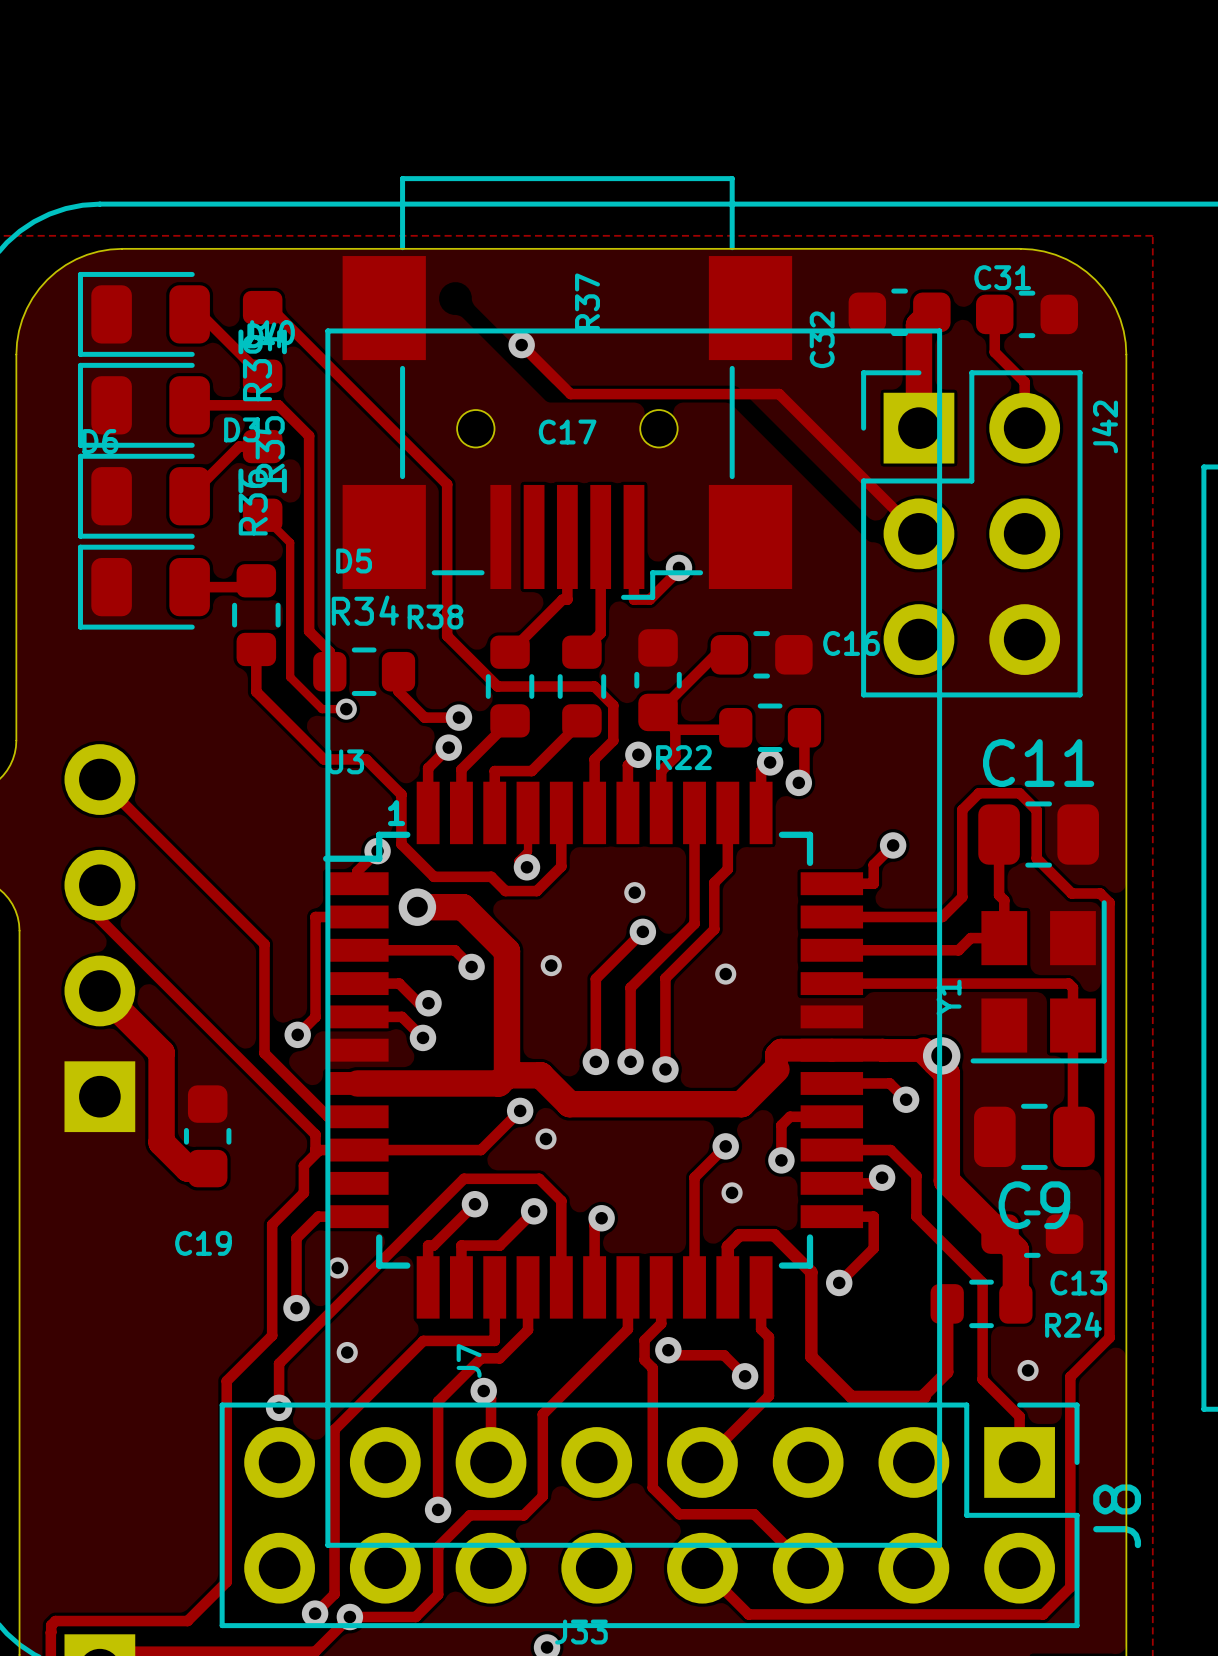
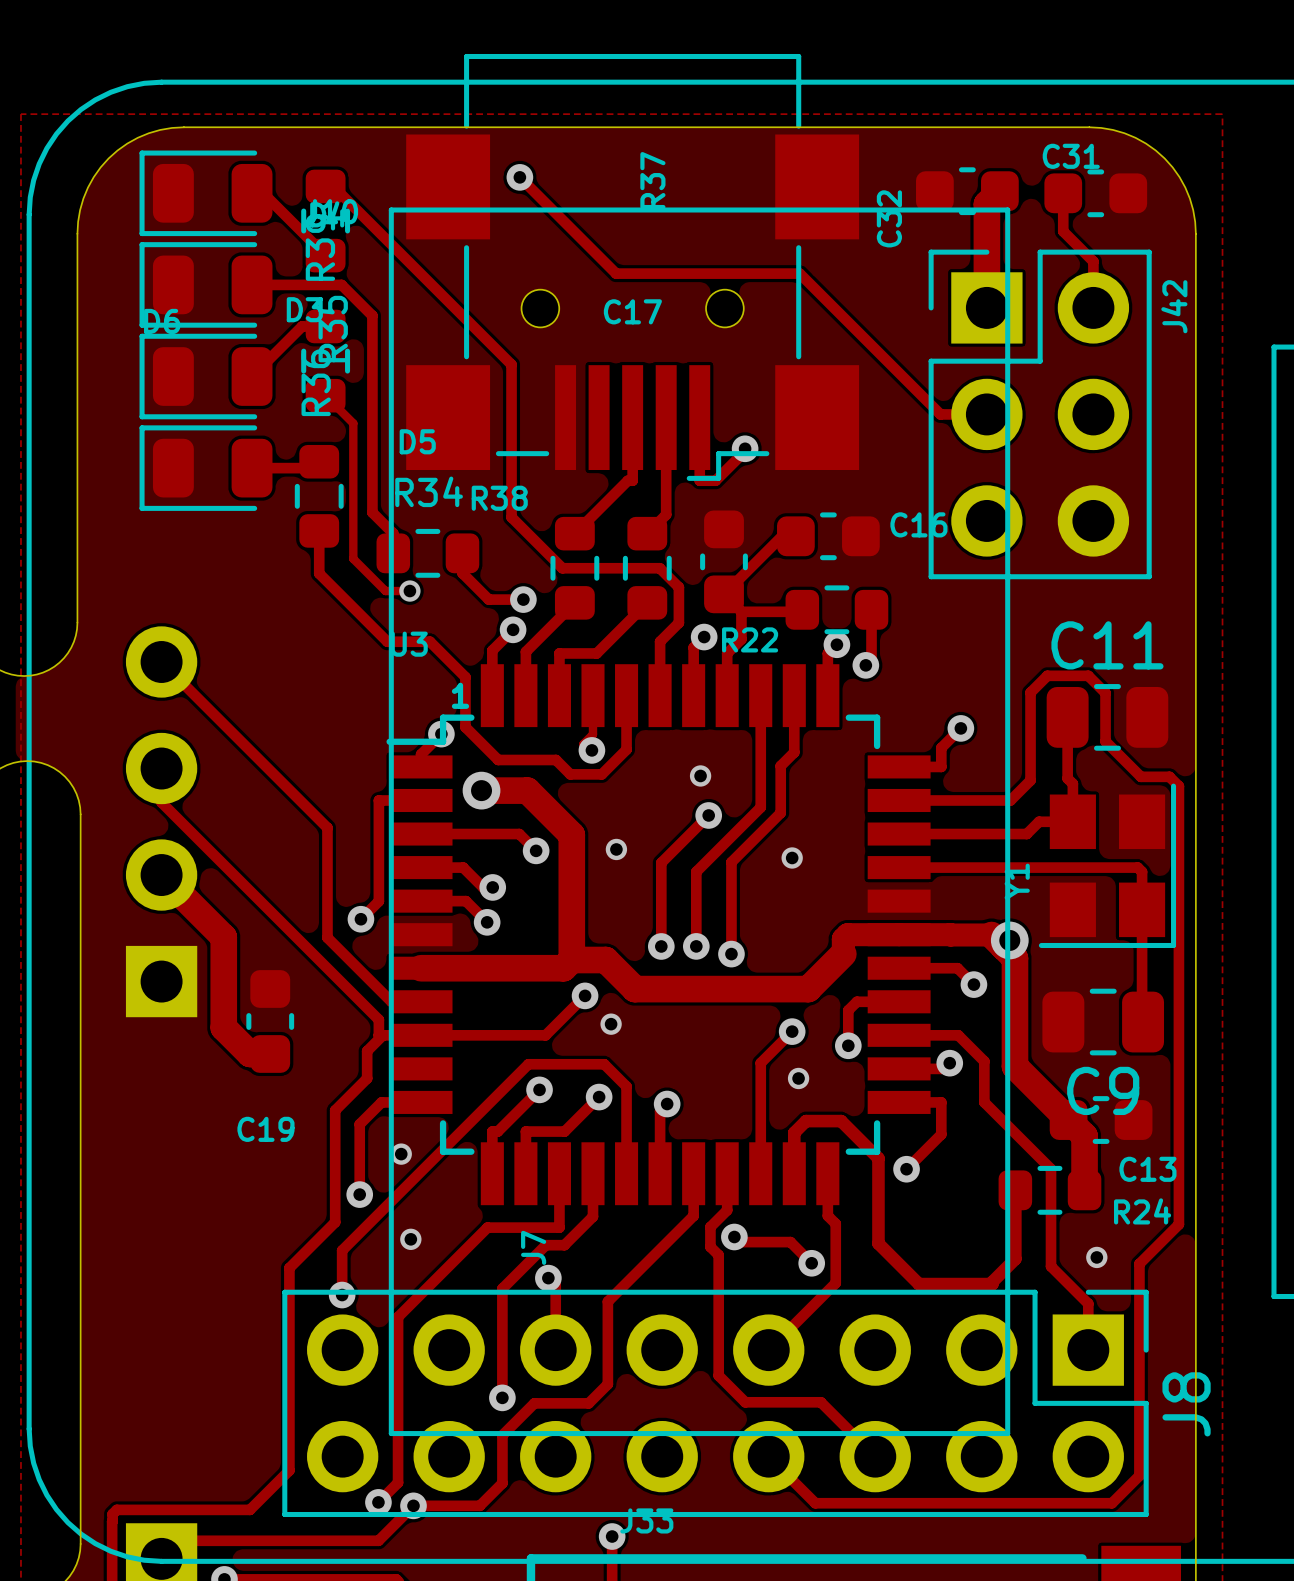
track: (521, 345) (570, 394) -> (519, 177) (616, 273) (636, 273)
via position: (521, 345) -> (519, 177)
track: (733, 394) (779, 394) (918, 533) -> (799, 273) (940, 414) (986, 414)

